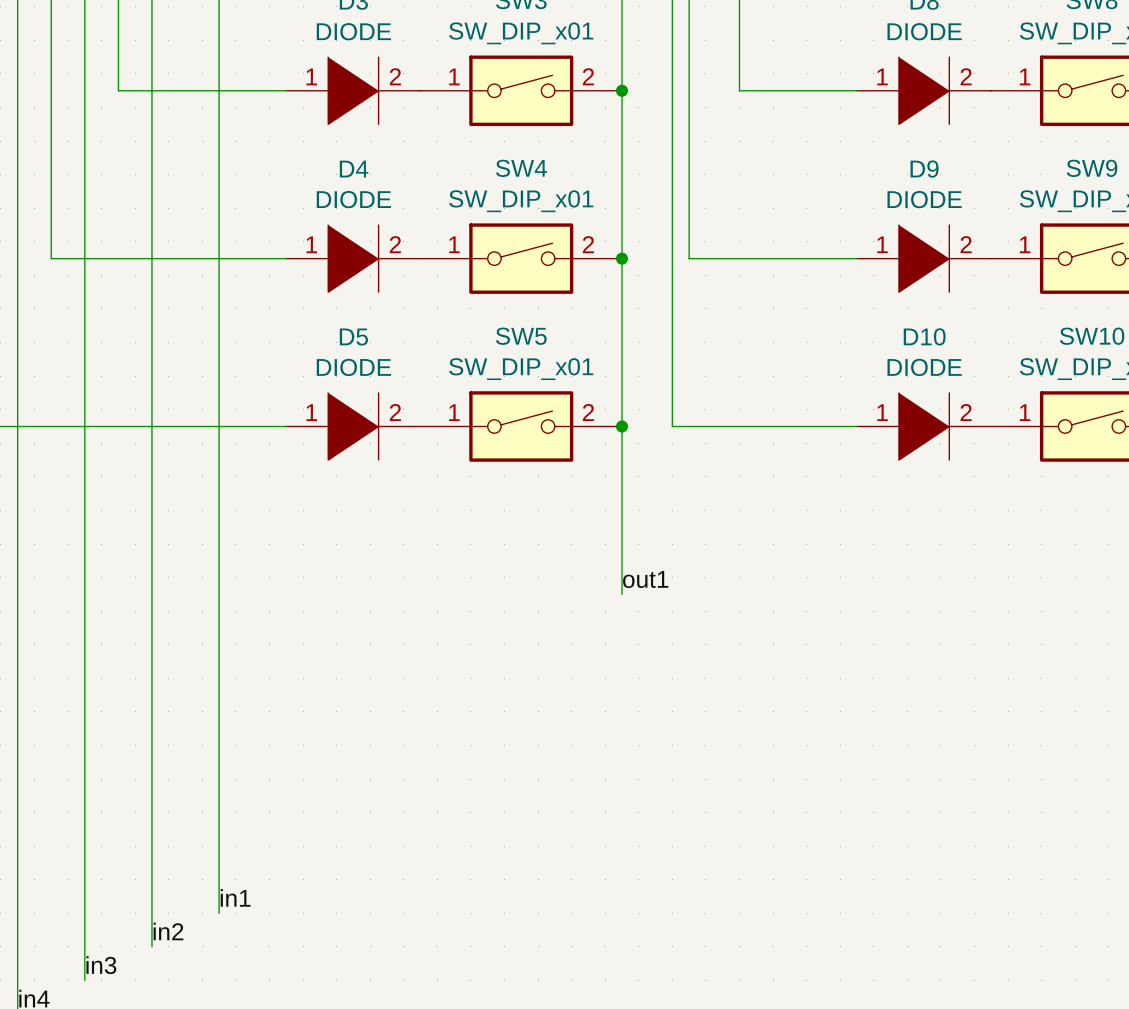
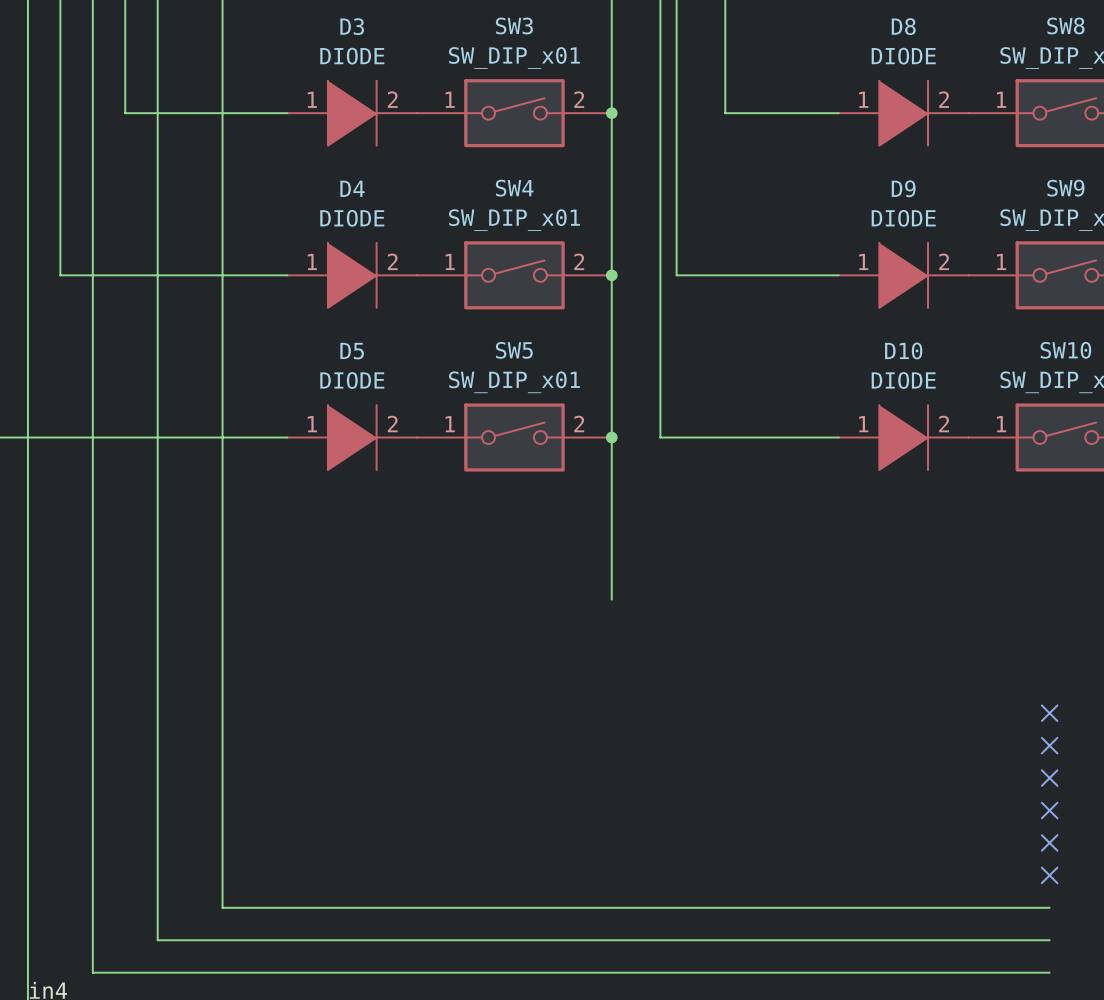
label: out1 (645, 579) -> none
no-connect mark: none -> (1049, 713)
no-connect mark: none -> (1049, 745)
no-connect mark: none -> (1049, 778)
no-connect mark: none -> (1049, 810)
no-connect mark: none -> (1049, 842)
no-connect mark: none -> (1049, 875)
label: in1 (235, 897) -> none
wire: none -> (222, 907) (1049, 907)
label: in2 (168, 931) -> none
wire: none -> (157, 940) (1049, 940)
label: in3 (101, 965) -> none
wire: none -> (92, 972) (1049, 972)

